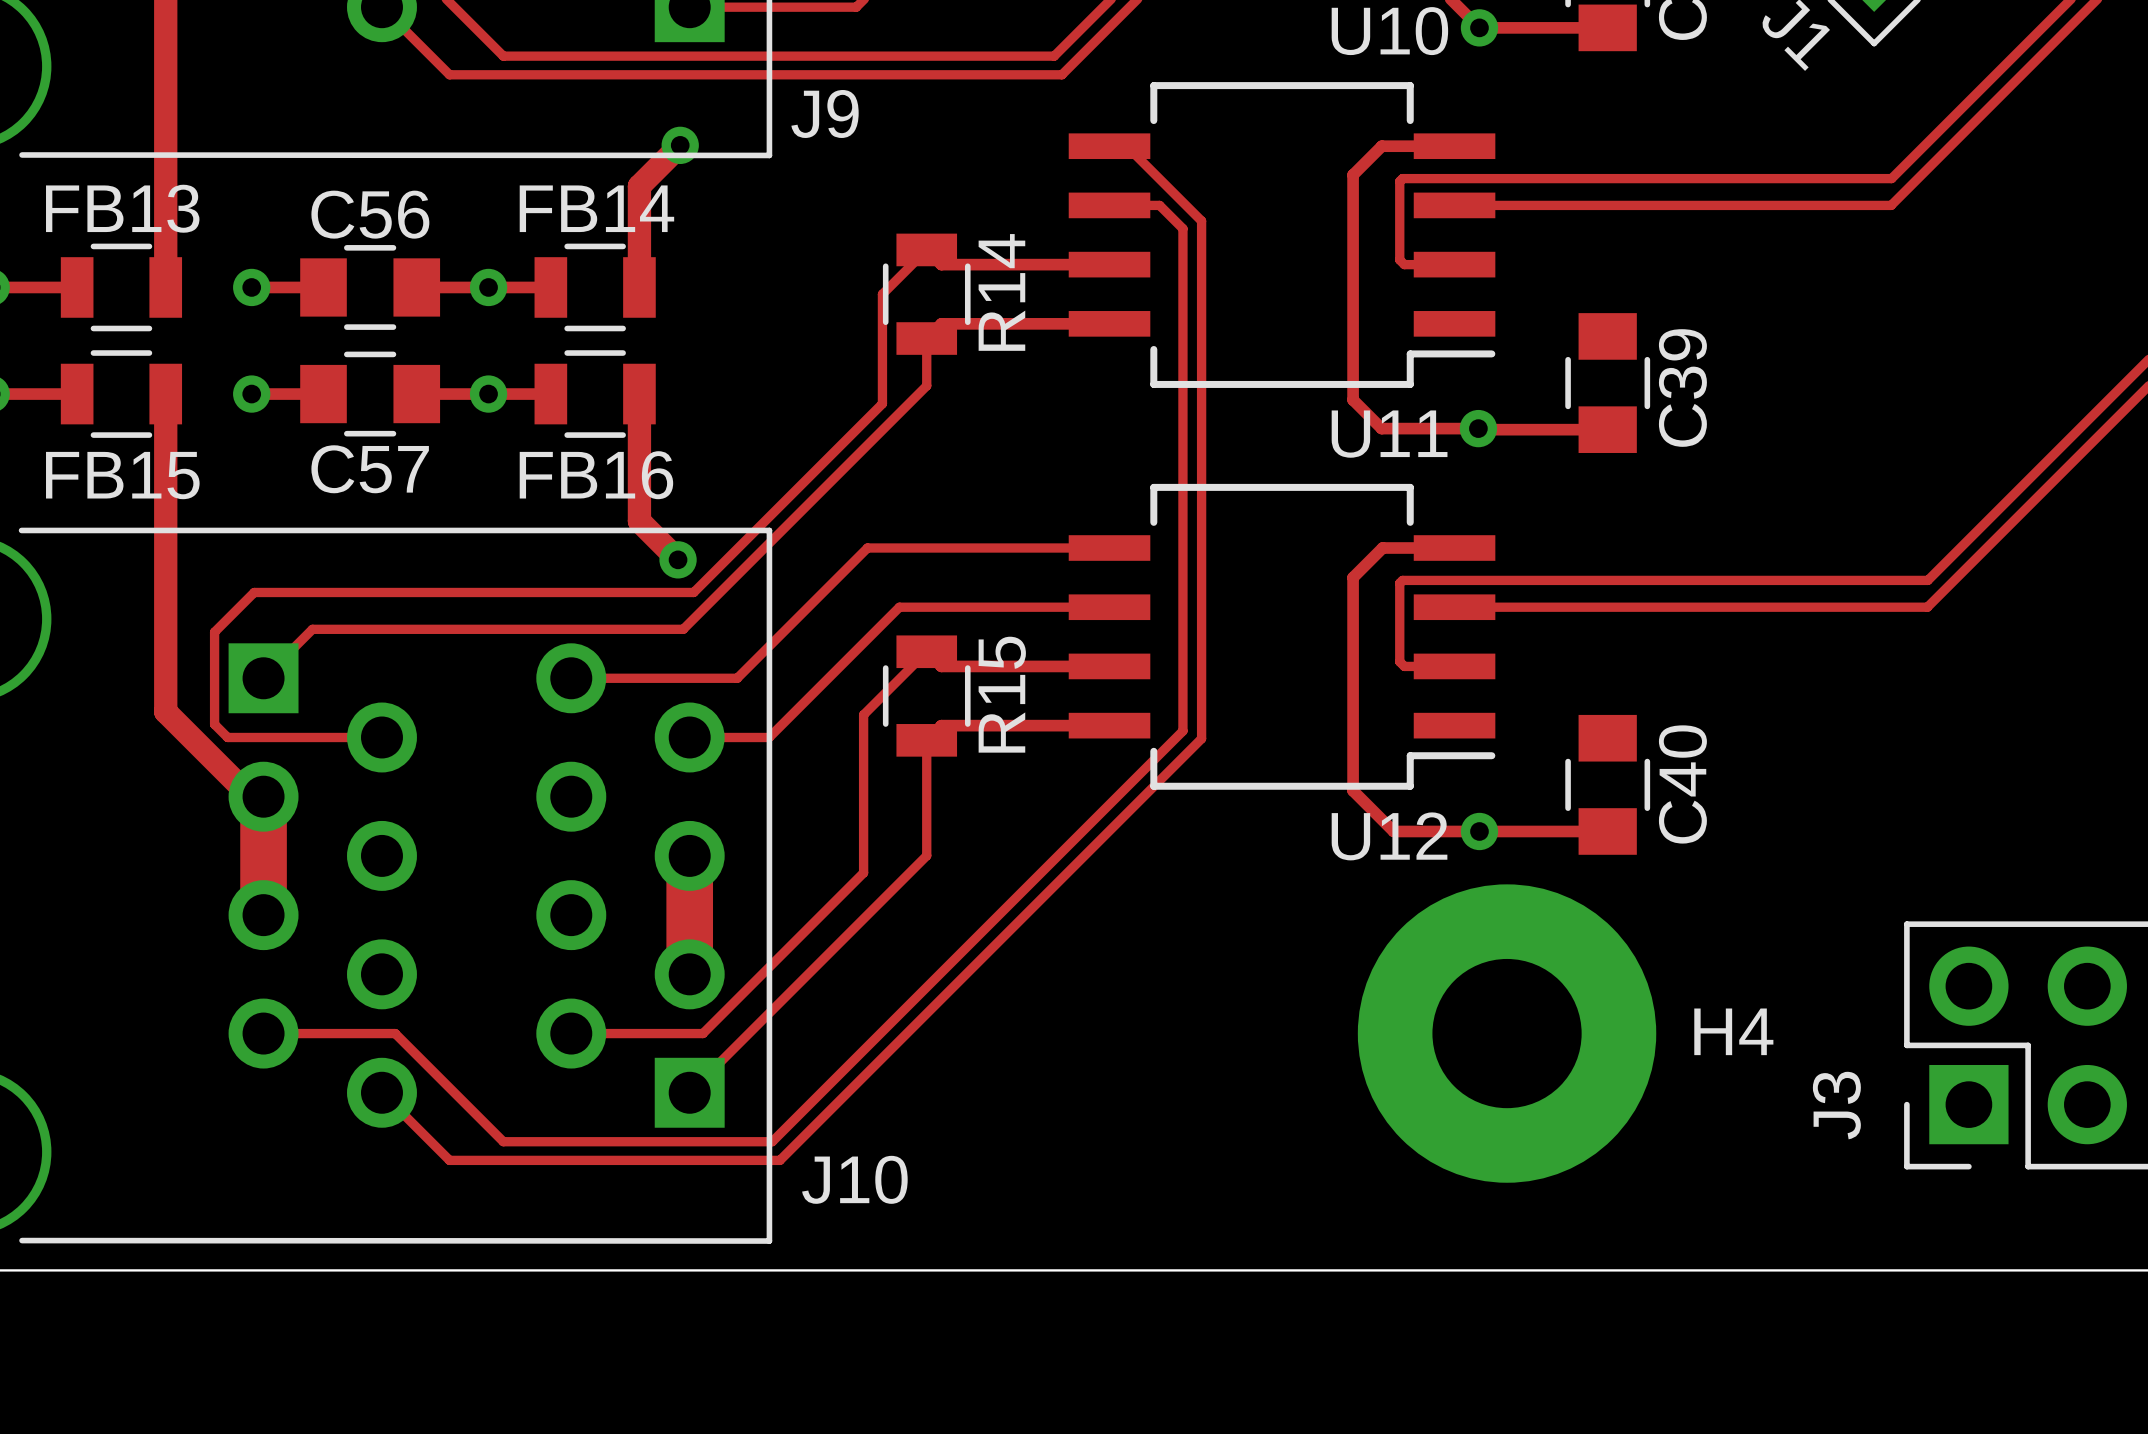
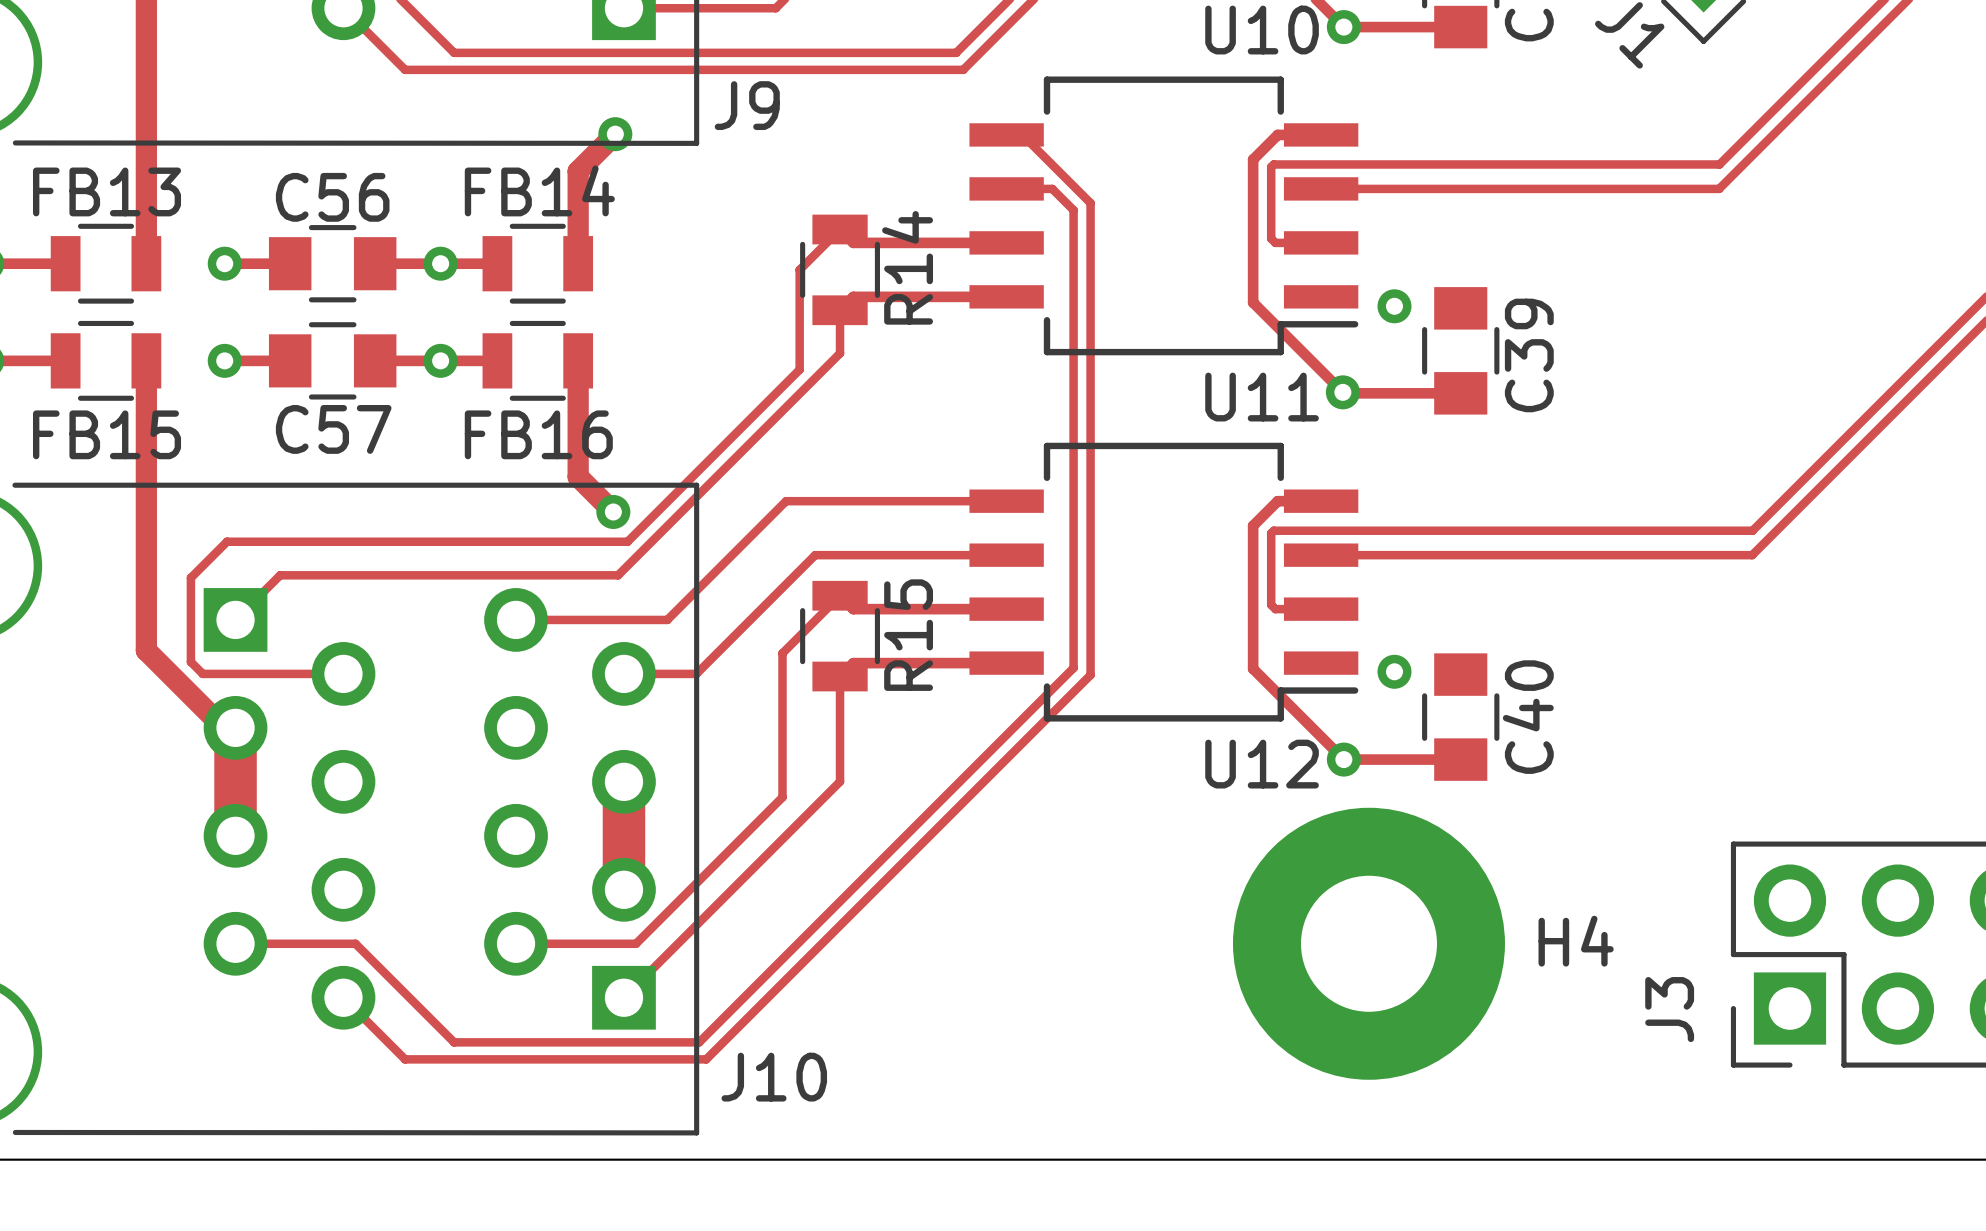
track: (1406, 146) (1381, 146) (1353, 174) (1353, 399) (1381, 428) (1478, 428) -> (1277, 134) (1253, 159) (1253, 302) (1342, 392)
via: none -> (1394, 306)
track: (1406, 548) (1382, 548) (1353, 577) (1353, 790) (1393, 831) (1479, 831) -> (1277, 501) (1253, 525) (1253, 668) (1343, 759)
via: none -> (1394, 671)

